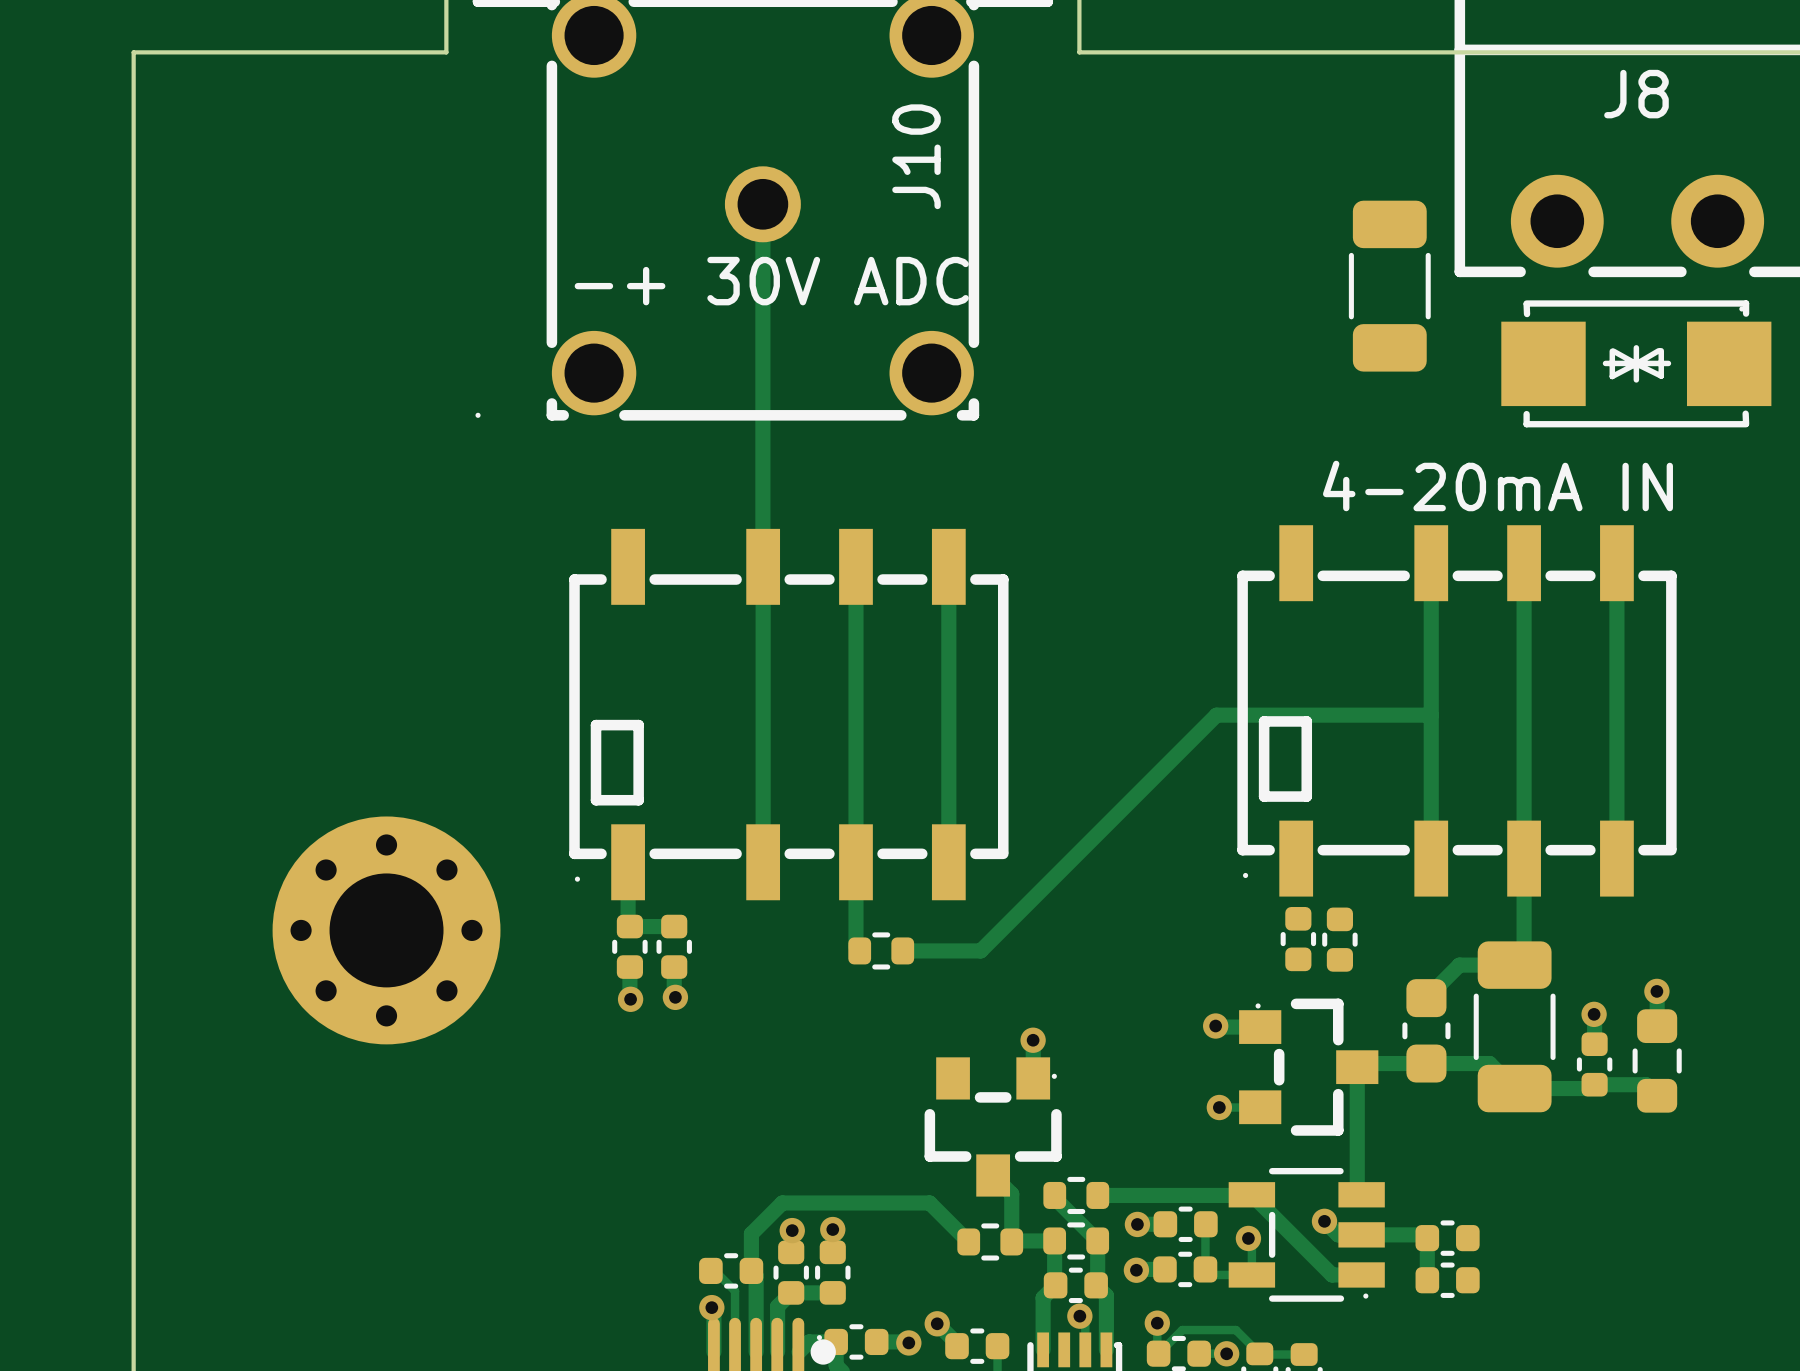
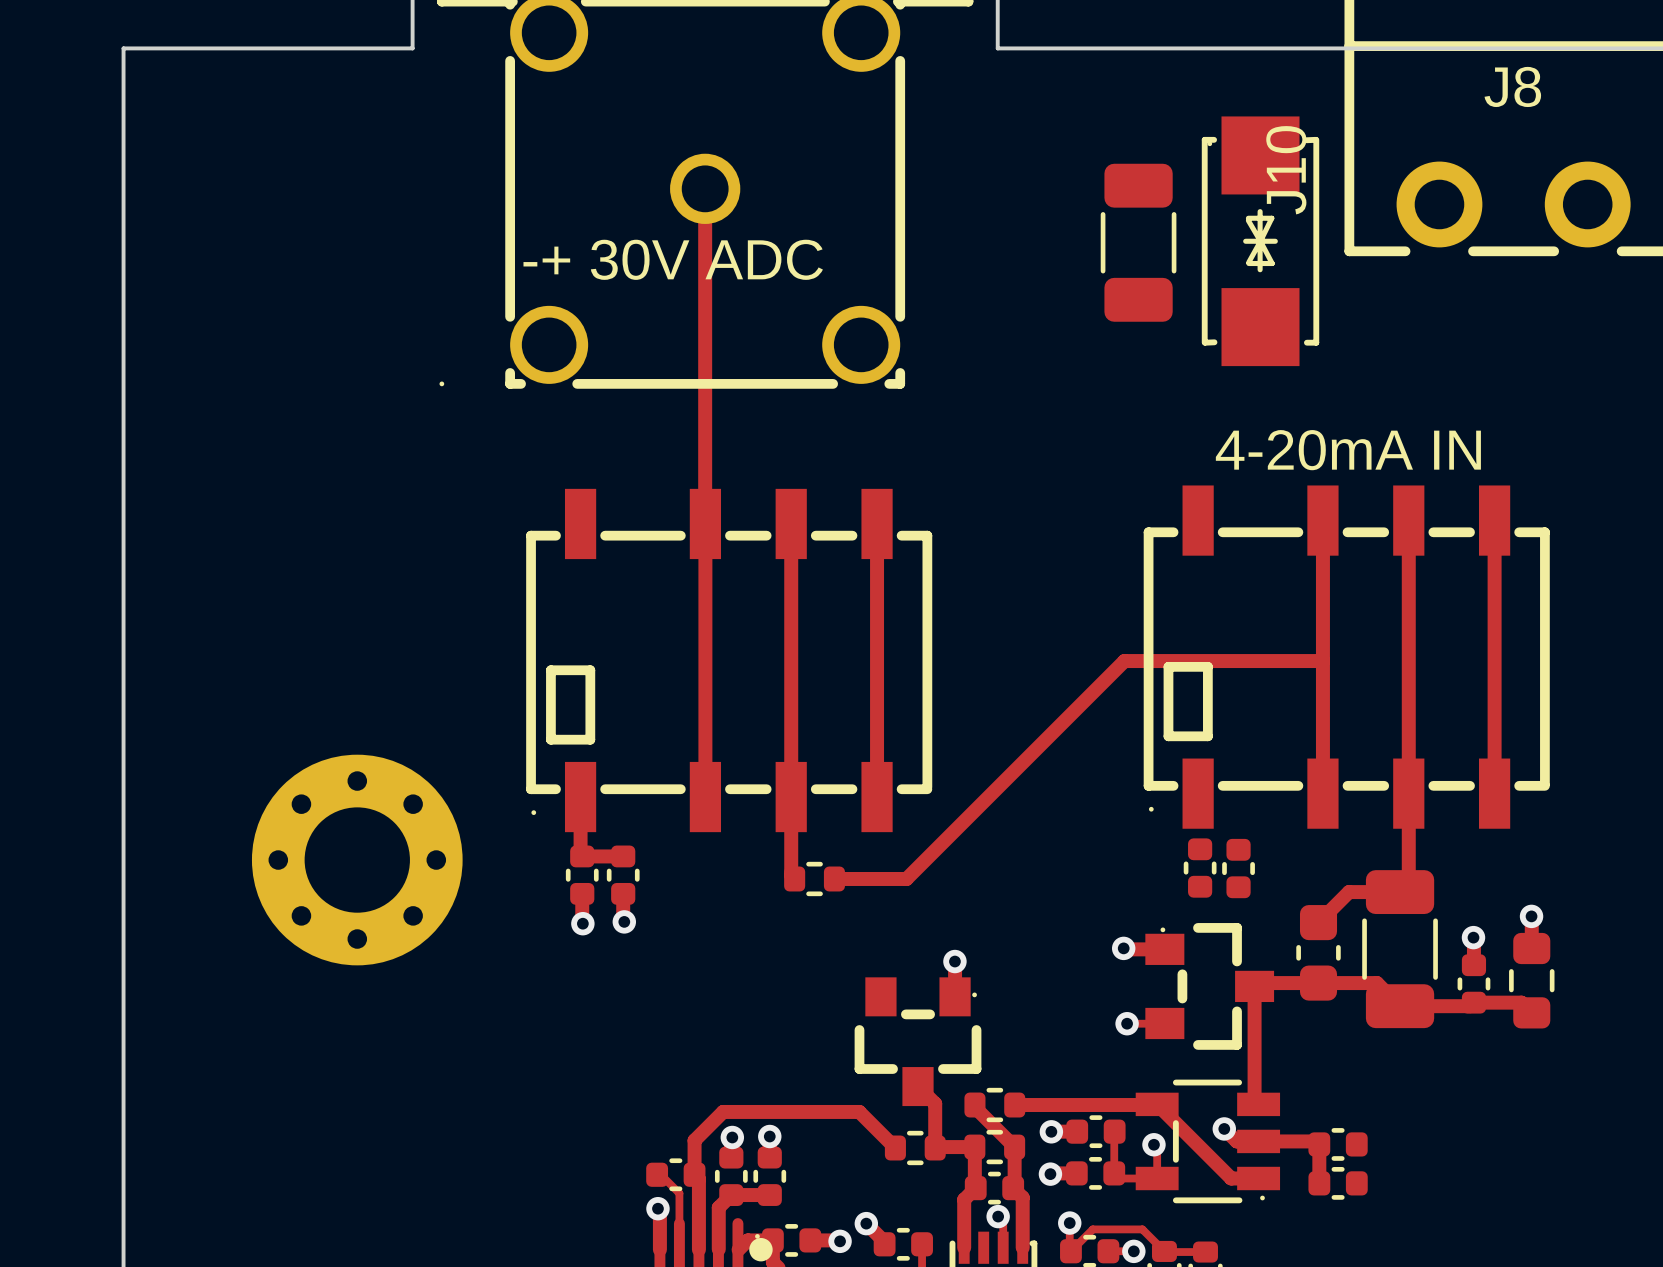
J10 name position: J10 (916, 156) -> J10 (1286, 170)
part footprint: [1348, 200, 1431, 372] -> [1201, 116, 1320, 367]
part: none -> (1138, 242)
part: (1636, 363) -> none

